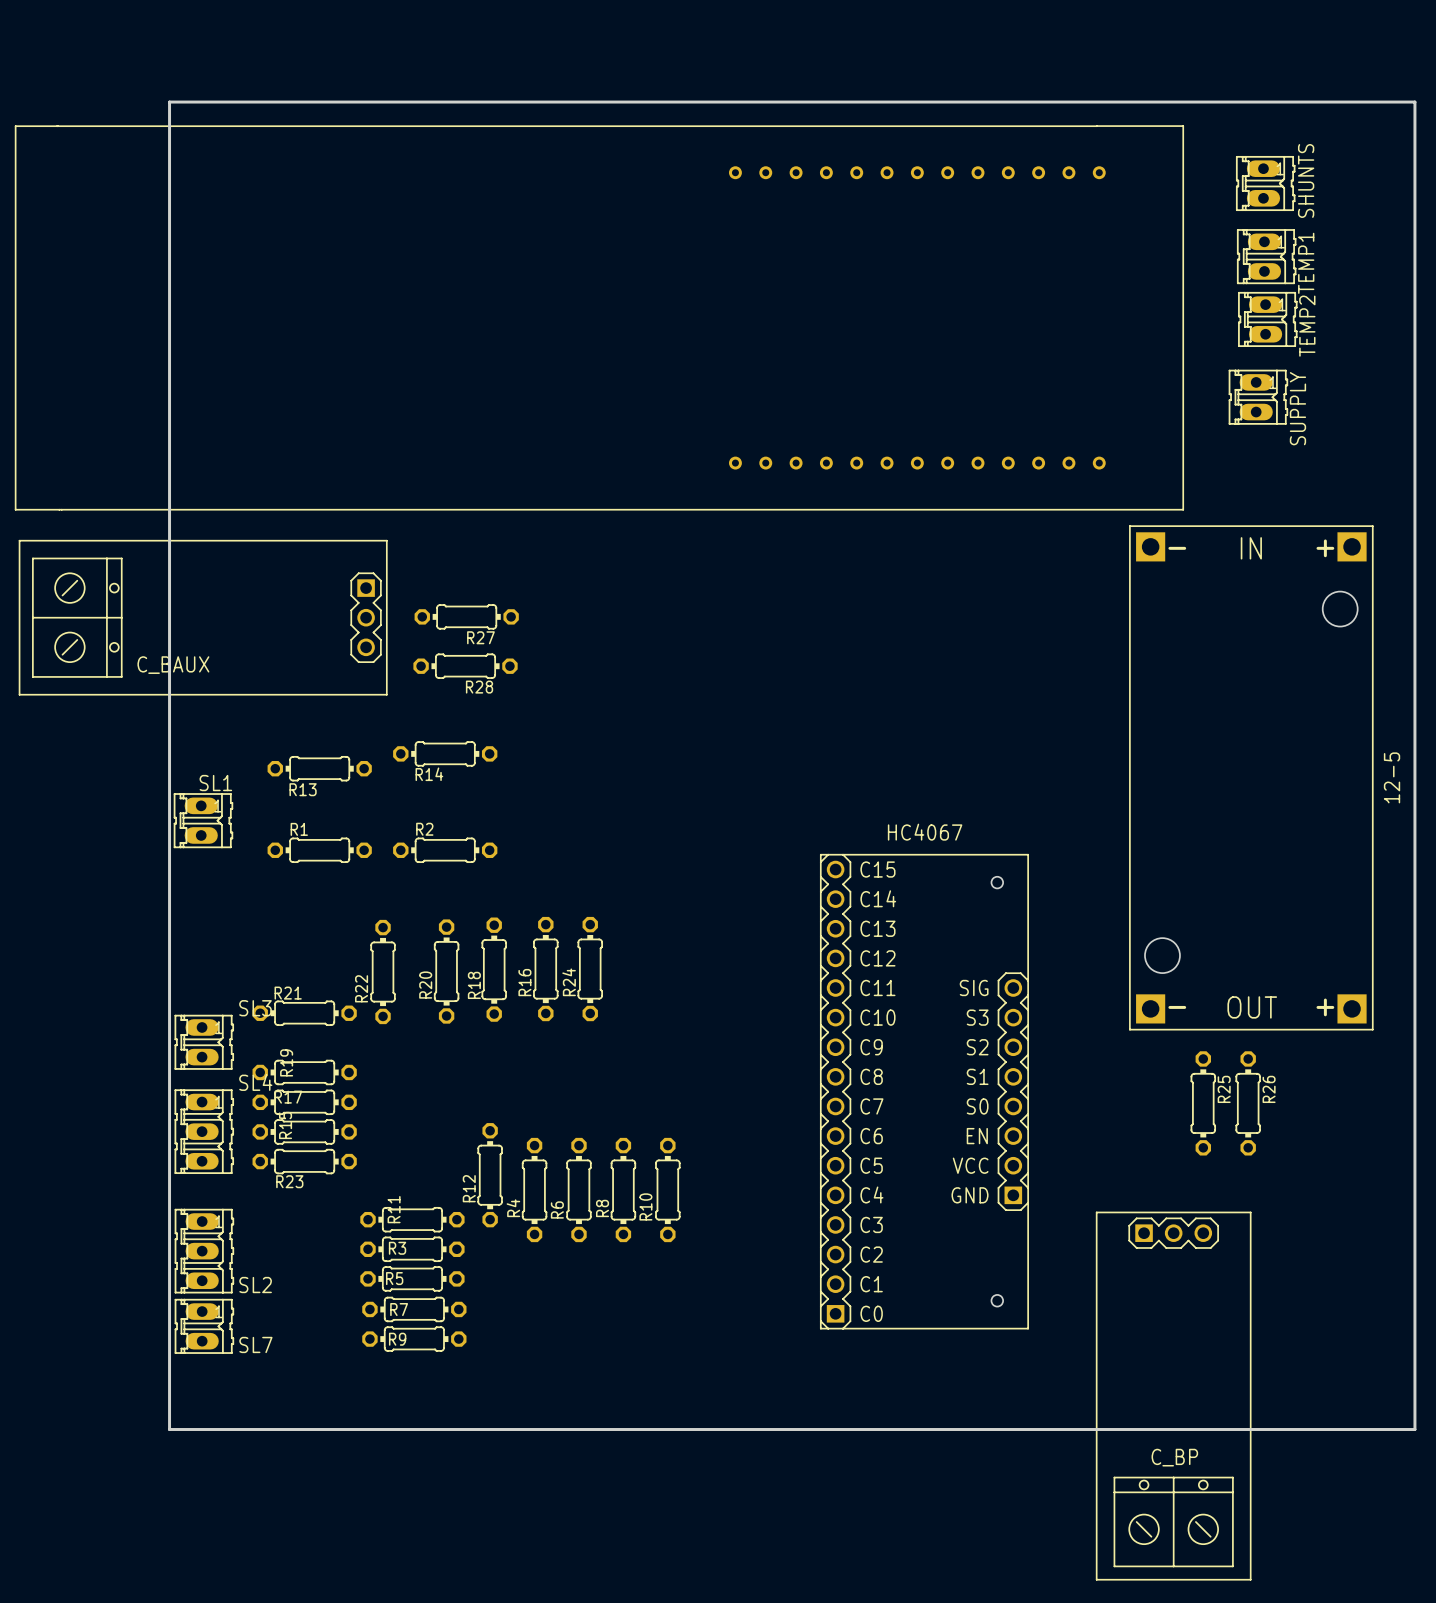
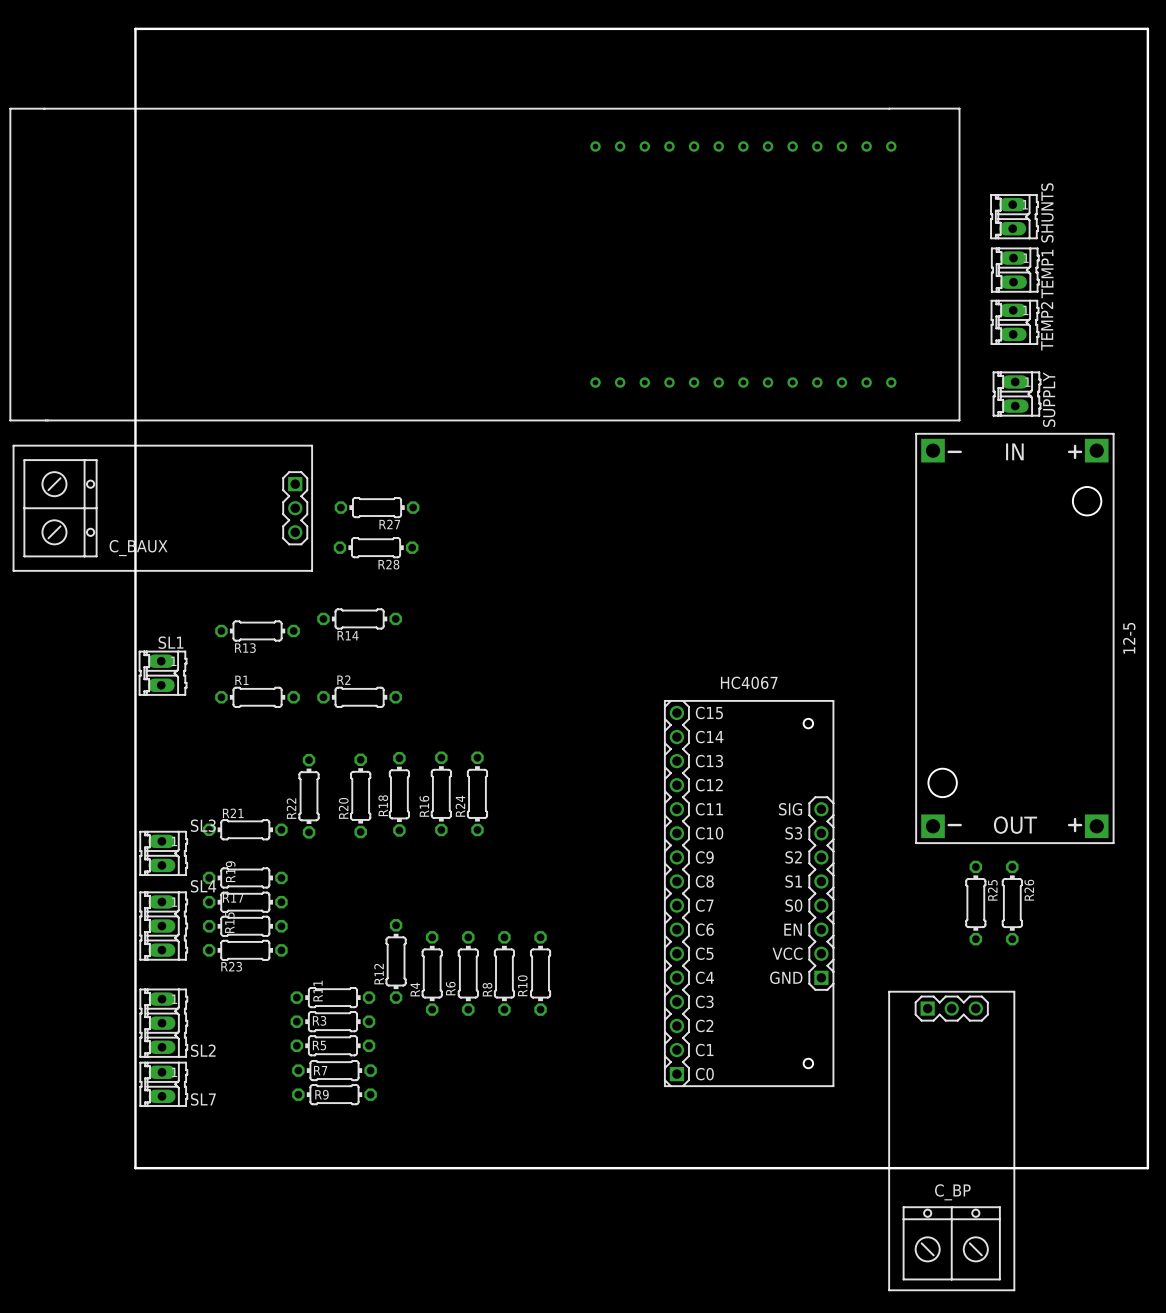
board edge: (169, 102) (1414, 102) -> (135, 89) (135, 28) (1147, 28) (1147, 89)
SHUNTS position: (1265, 183) -> (1014, 216)
TEMP1 position: (1266, 256) -> (1015, 270)
TEMP2 position: (1267, 319) -> (1015, 322)
SUPPLY position: (1258, 397) -> (1017, 394)

